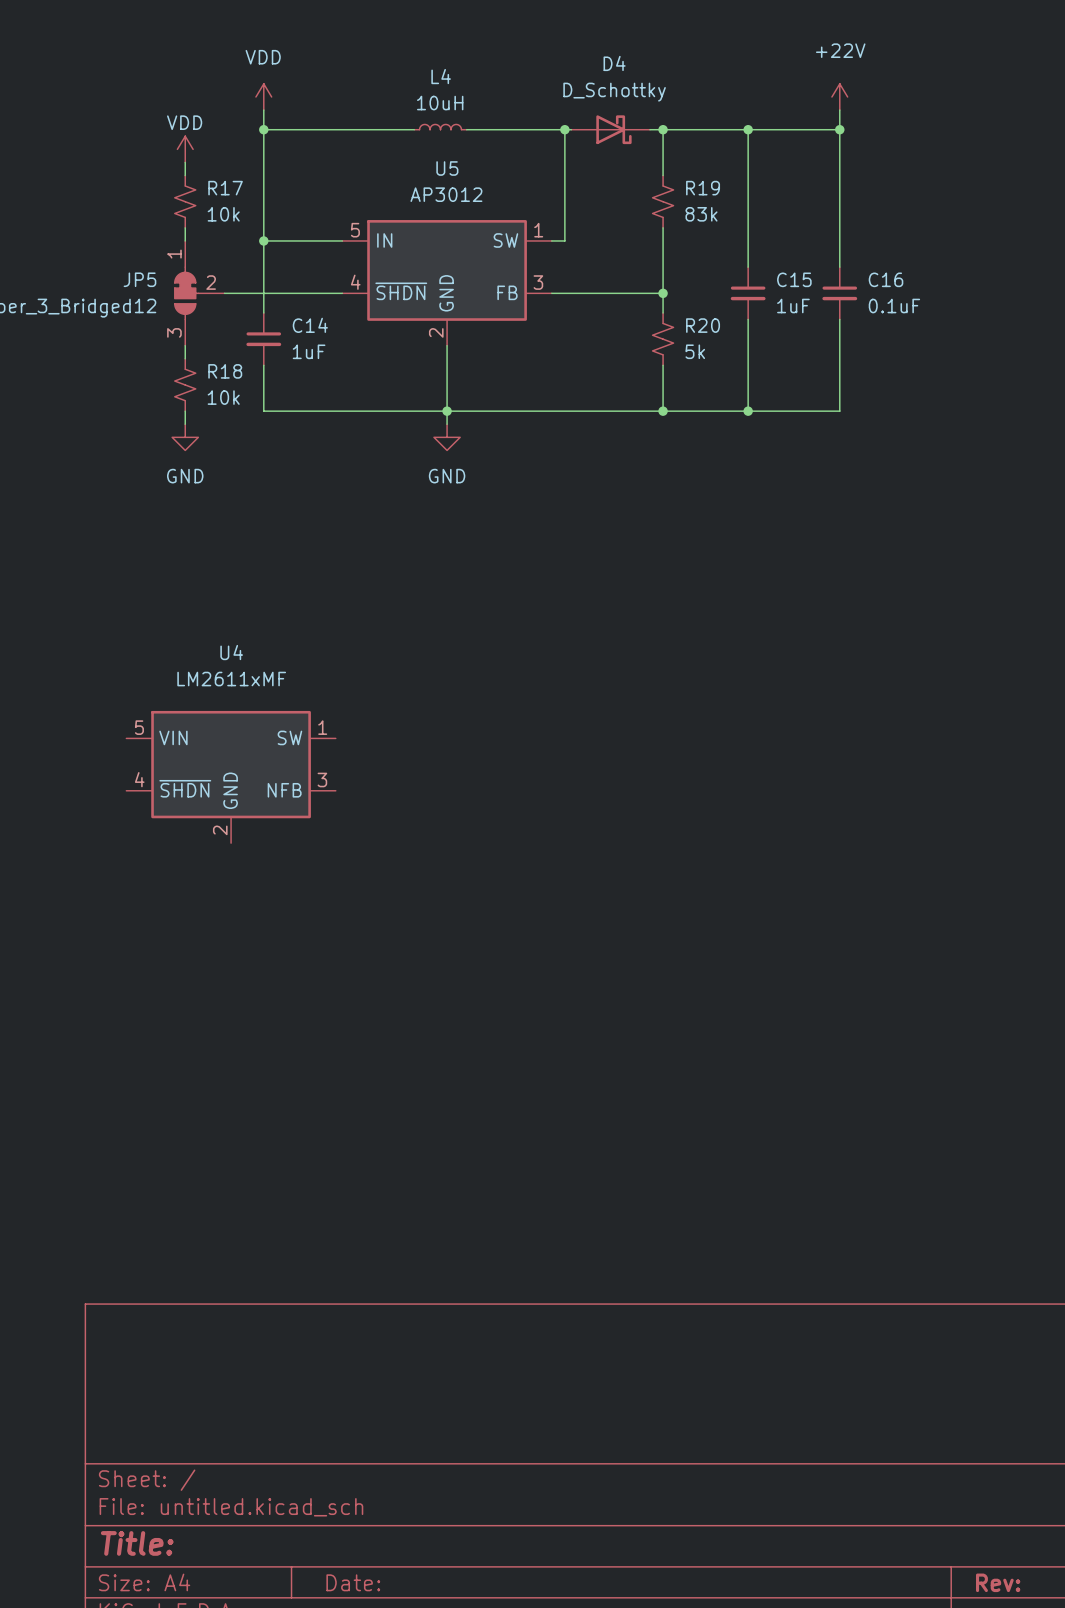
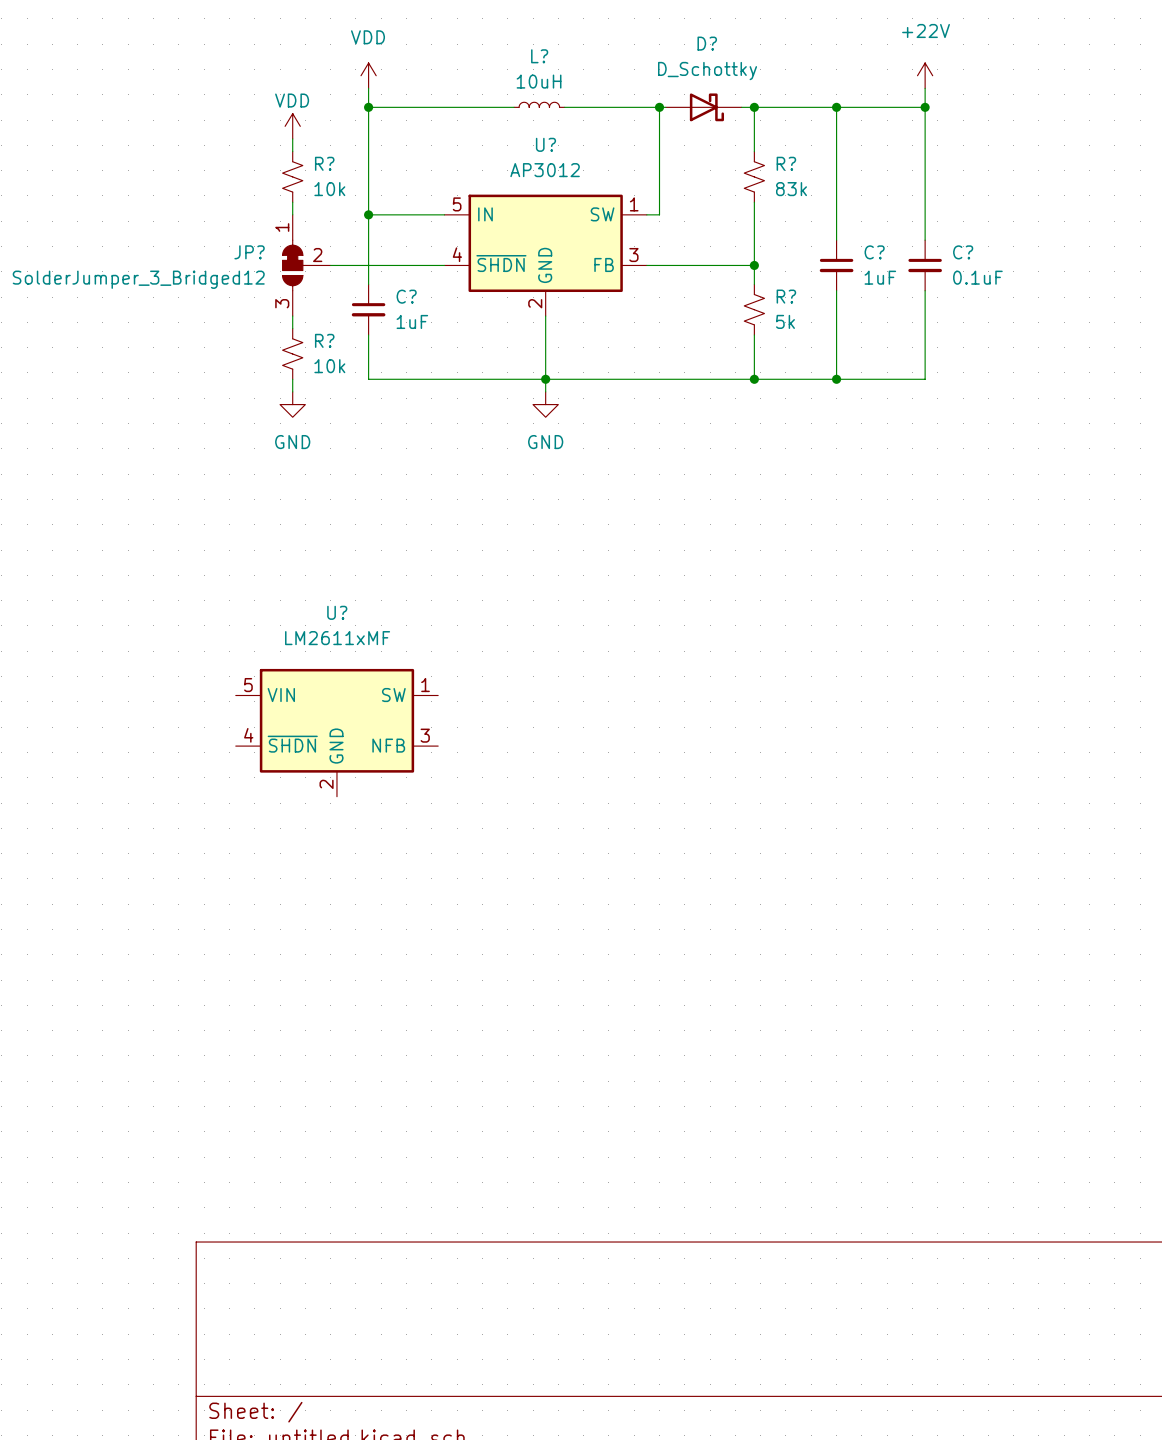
D4 name: D4 (614, 63) -> D? (707, 43)
L4 name: L4 (441, 76) -> L? (539, 56)
U5 name: U5 (447, 168) -> U? (545, 144)
R17 name: R17 (225, 188) -> R? (324, 163)
R19 name: R19 (703, 188) -> R? (786, 163)
JP5 name: JP5 (139, 279) -> JP? (249, 252)
C15 name: C15 (794, 279) -> C? (874, 252)
C16 name: C16 (886, 279) -> C? (963, 252)
C14 name: C14 (310, 325) -> C? (406, 296)
R20 name: R20 (703, 325) -> R? (786, 296)
R18 name: R18 (225, 371) -> R? (324, 340)
U4 name: U4 (231, 652) -> U? (337, 612)

